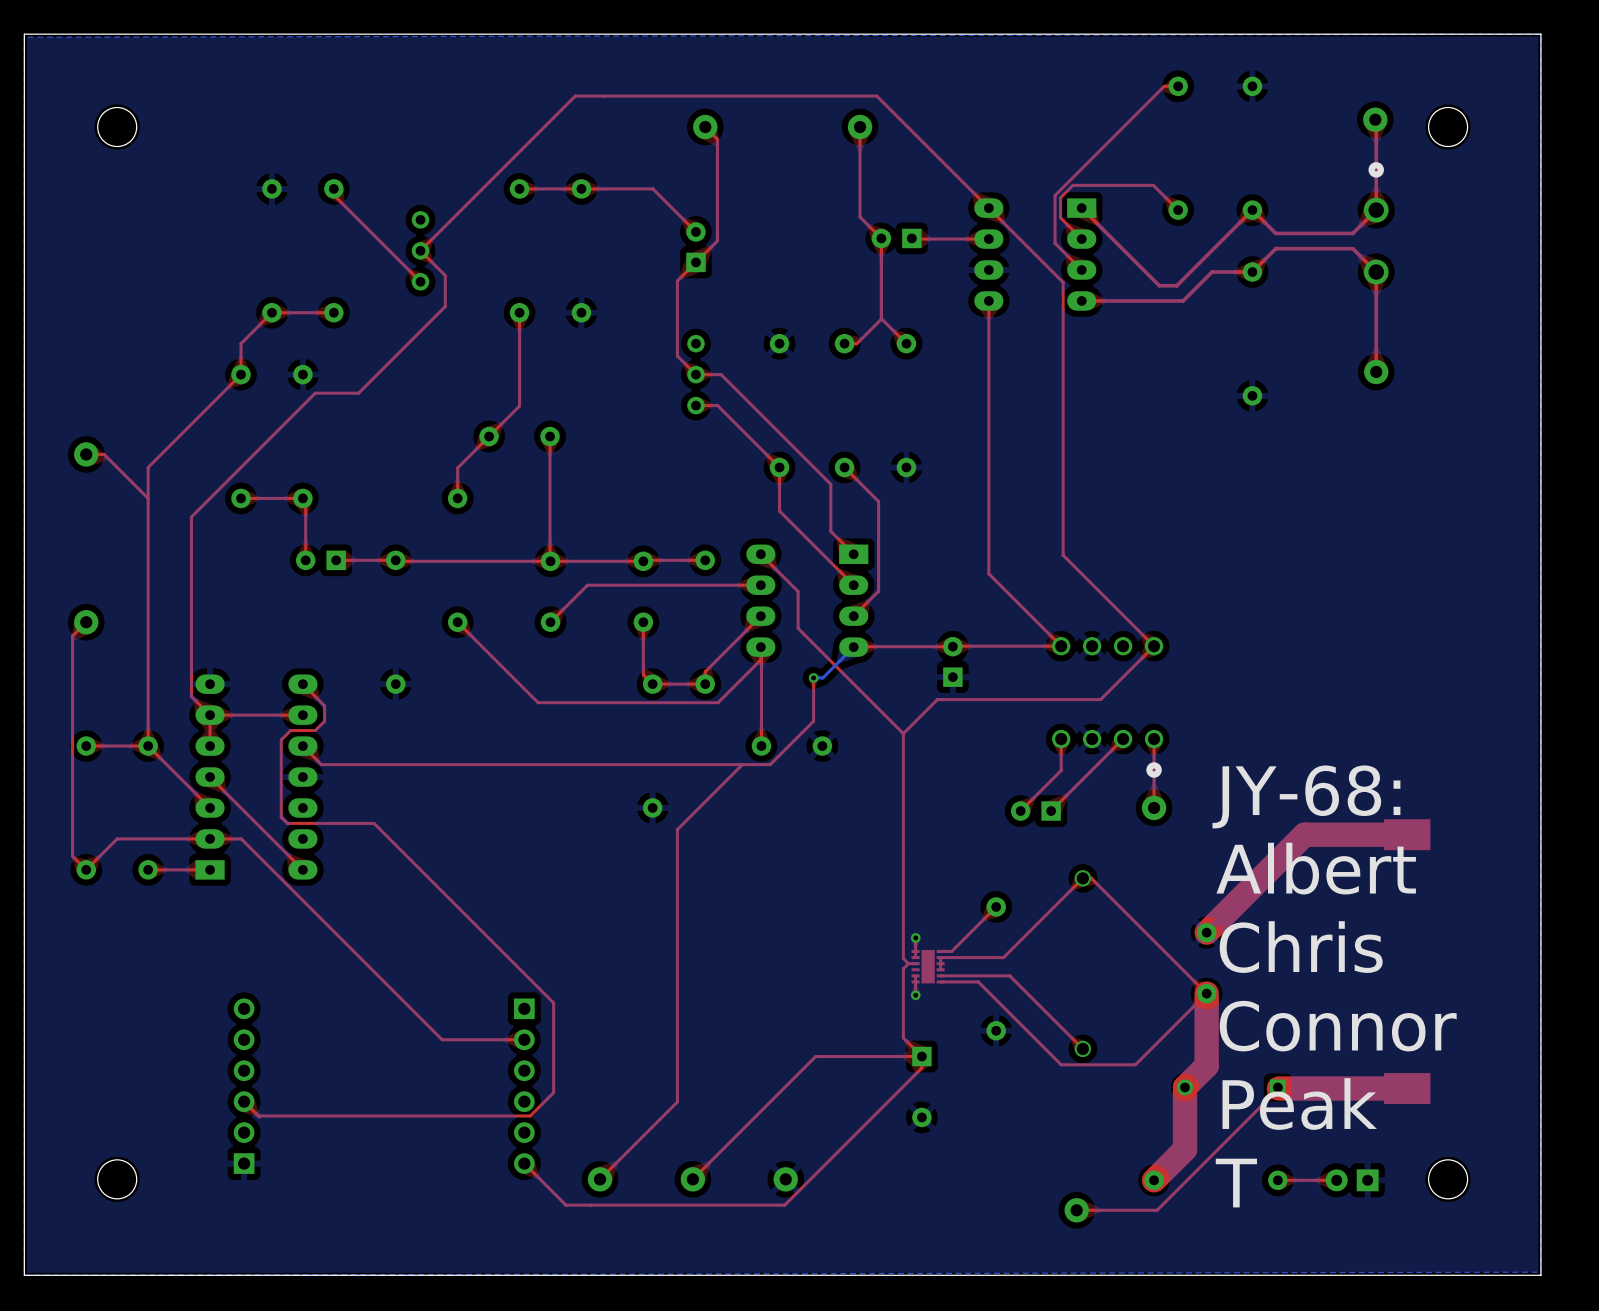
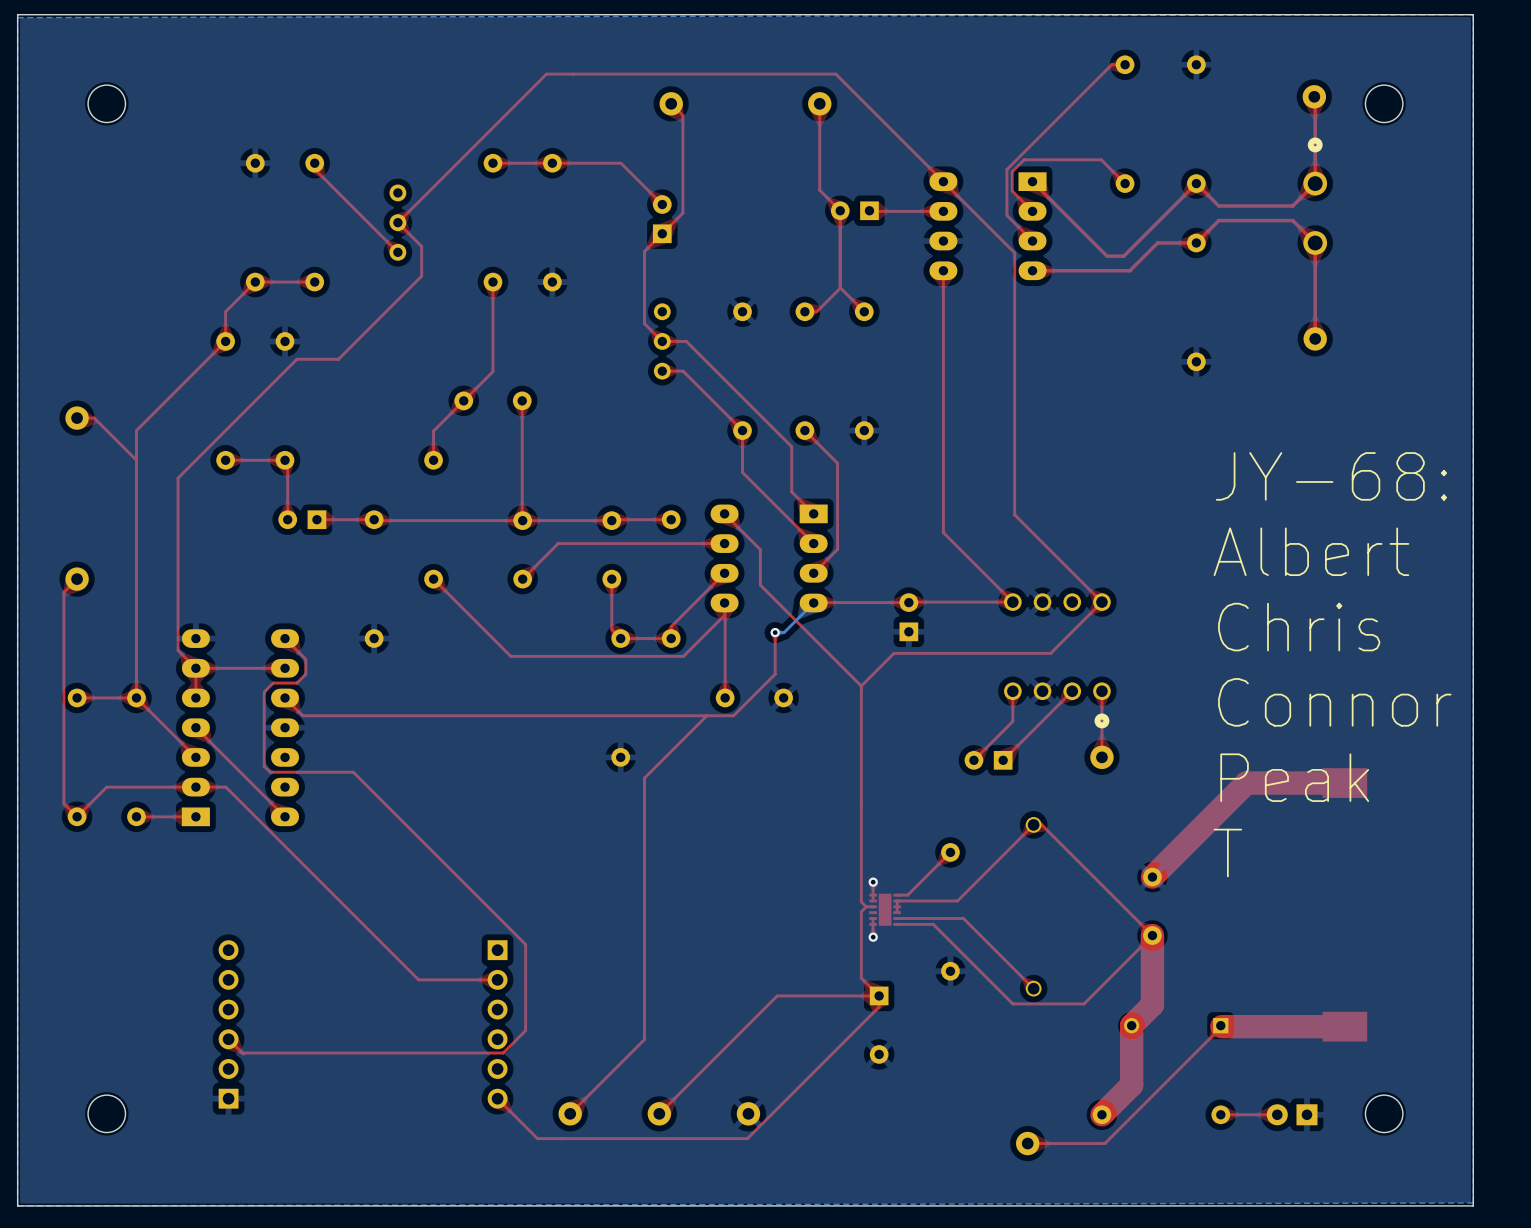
text position: JY-68: (1306, 796) -> JY-68: (1331, 476)
text position: Albert (1316, 868) -> Albert (1311, 551)
text position: Chris (1301, 947) -> Chris (1299, 627)
text position: Connor (1338, 1026) -> Connor (1334, 702)
text position: Peak (1299, 1104) -> Peak (1294, 777)
text position: T (1236, 1183) -> T (1227, 853)

